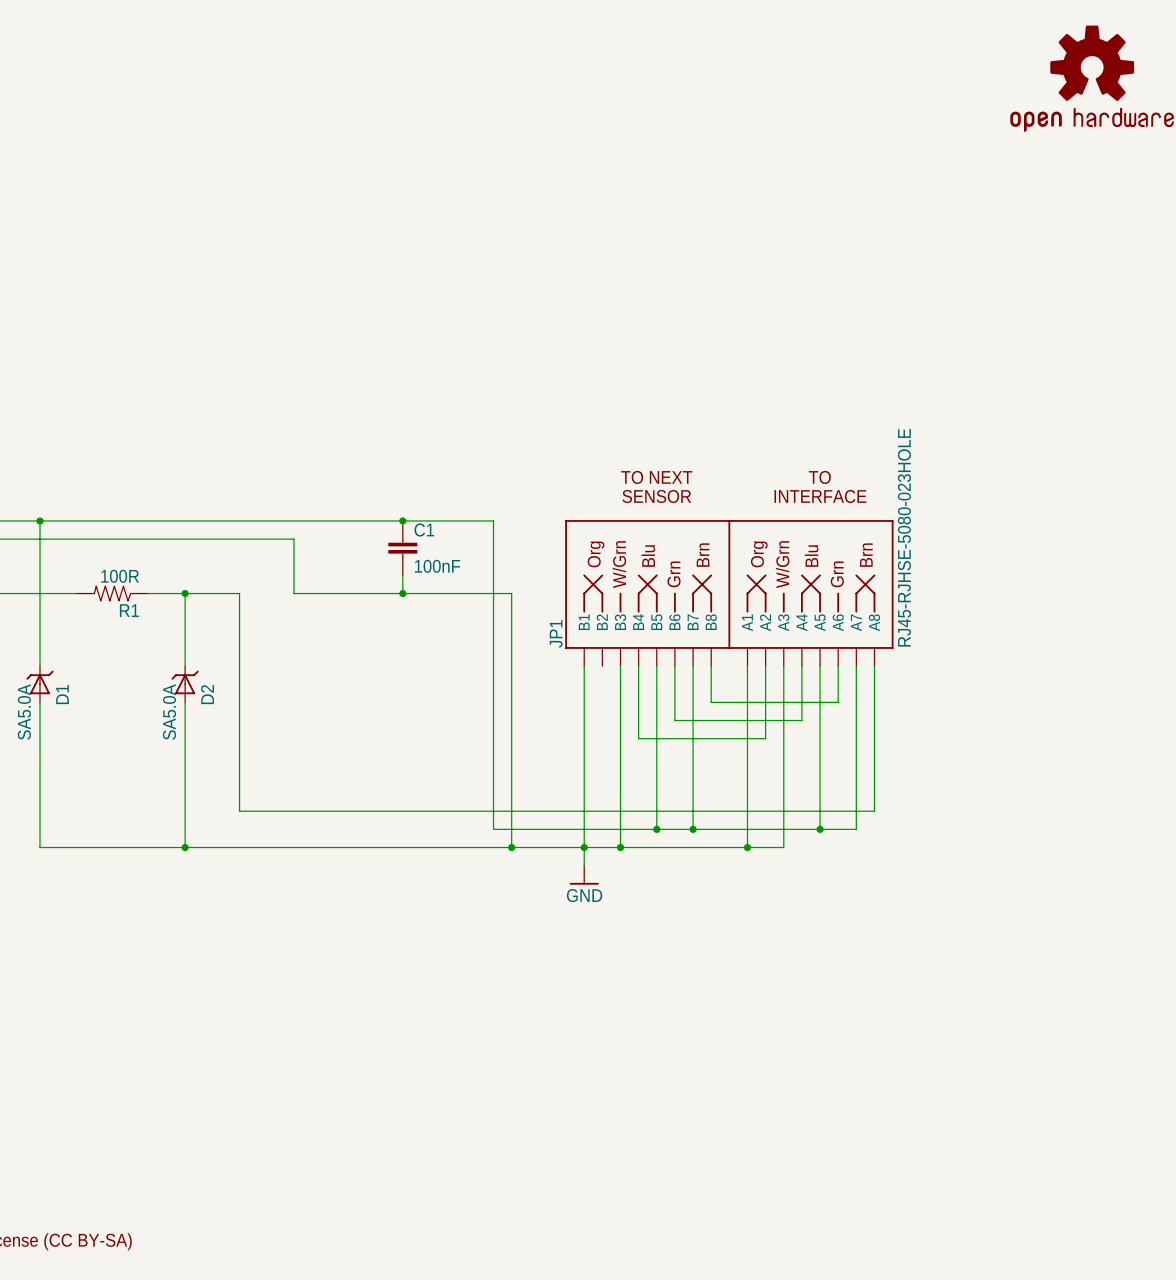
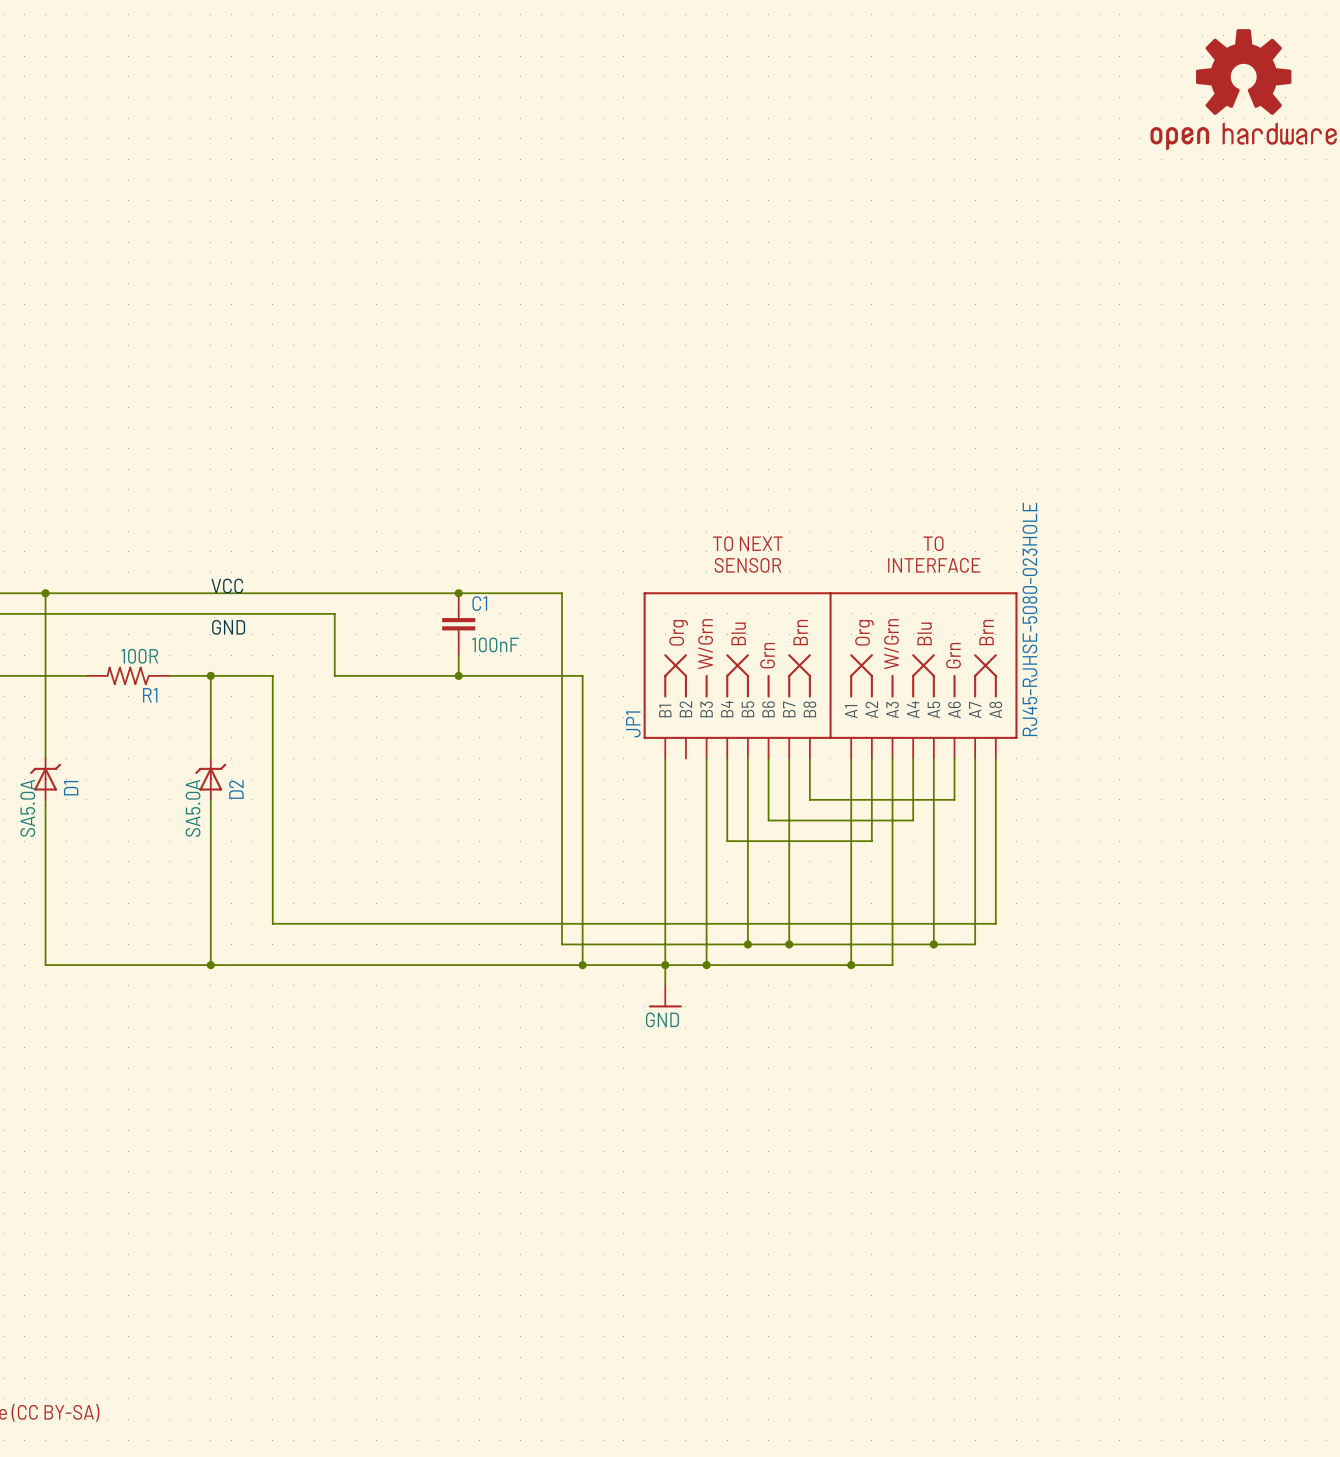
label: none -> VCC (227, 586)
label: none -> GND (228, 627)

